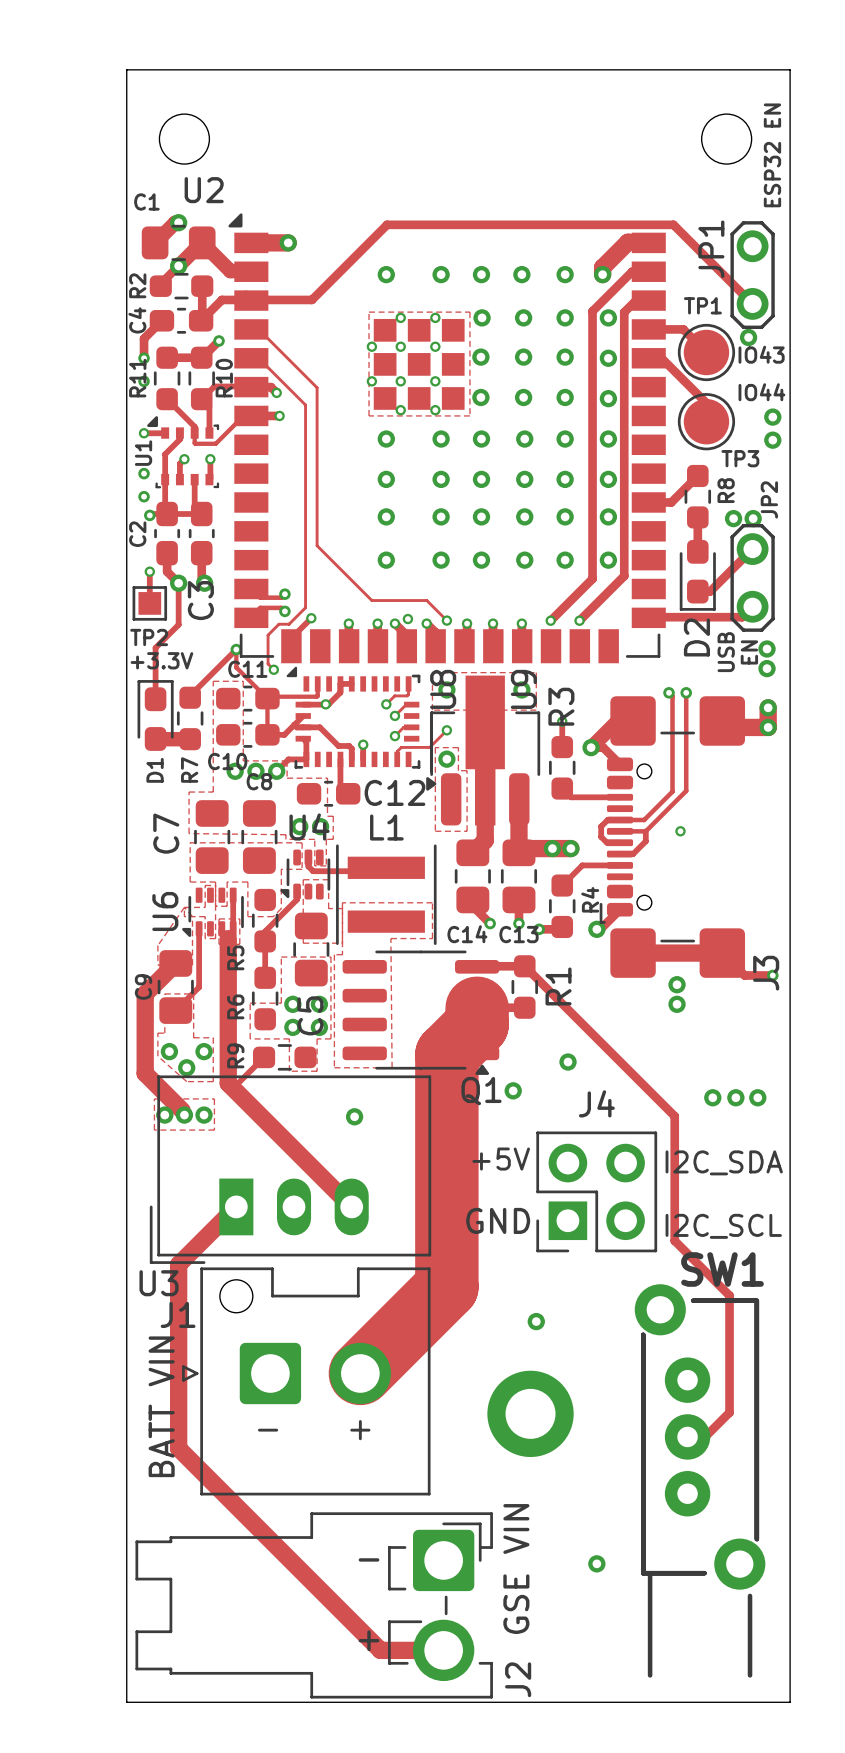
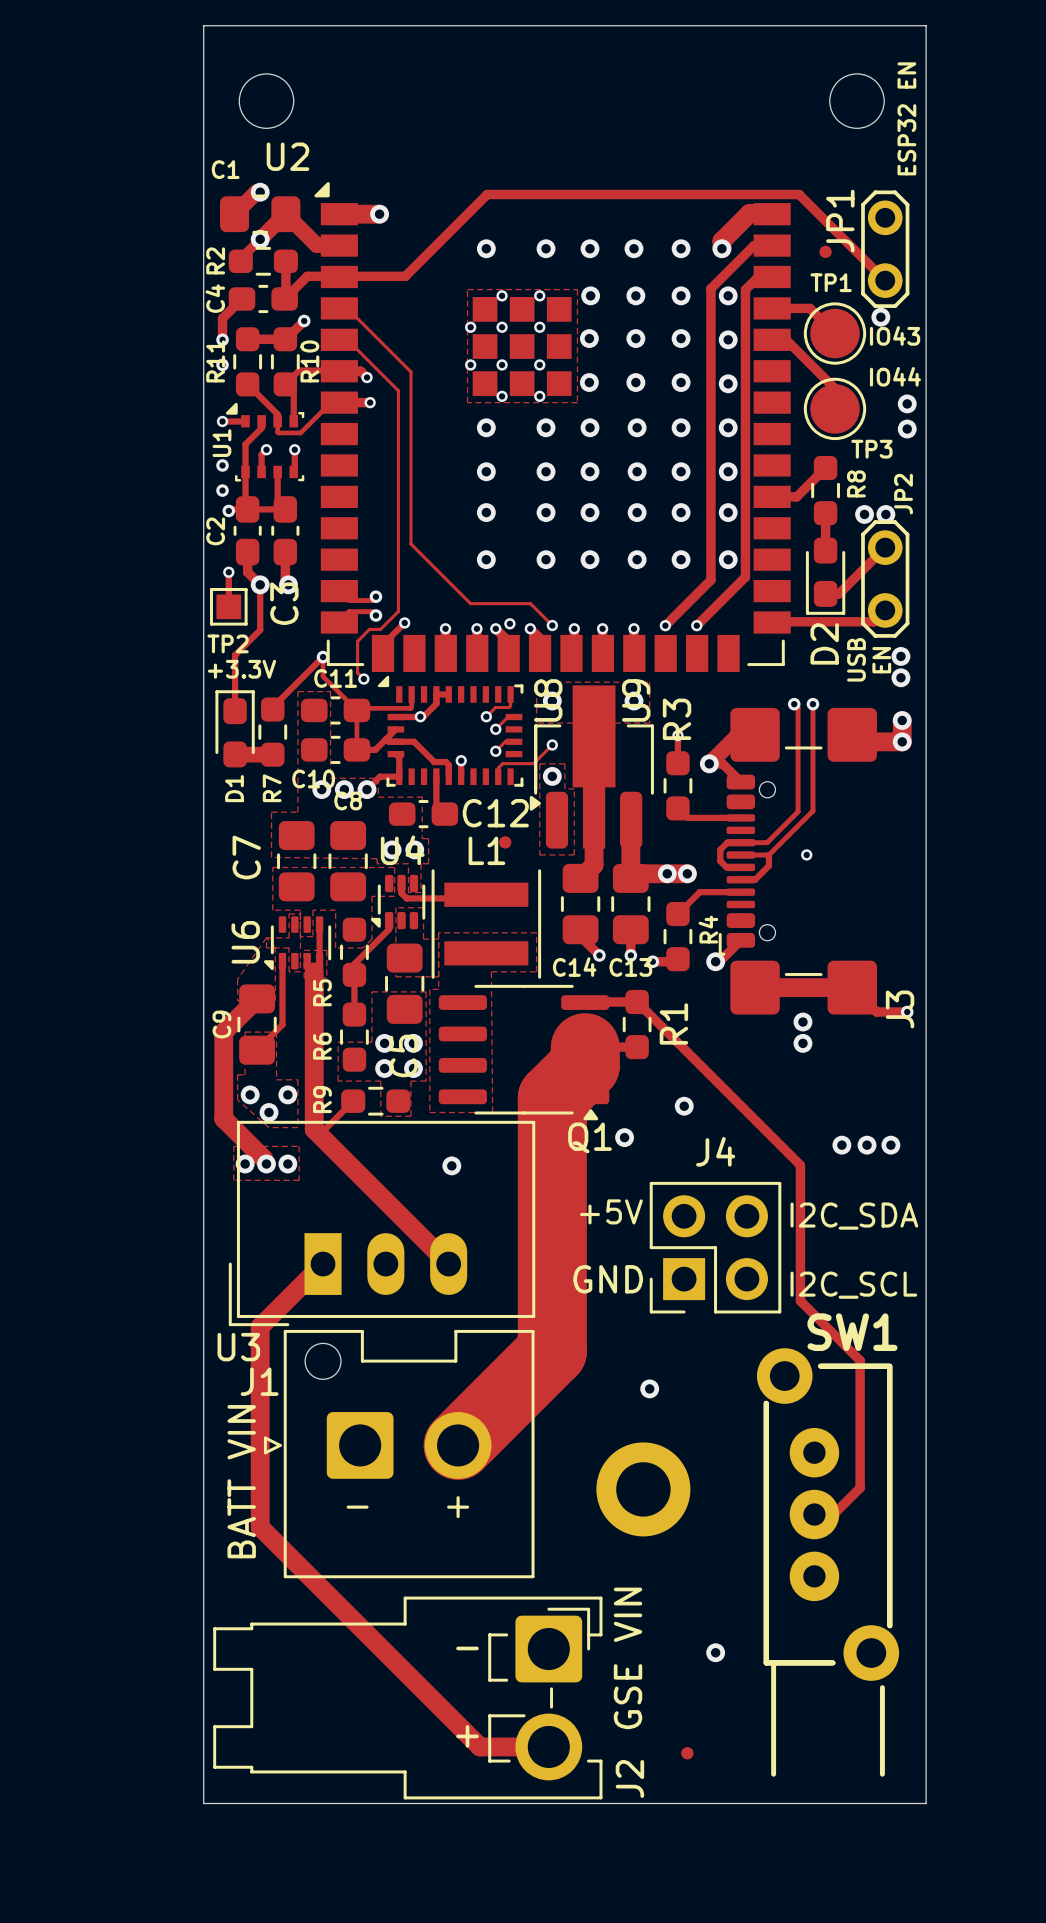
part: none -> (825, 251)
part: none -> (505, 842)
part: none -> (687, 1753)

